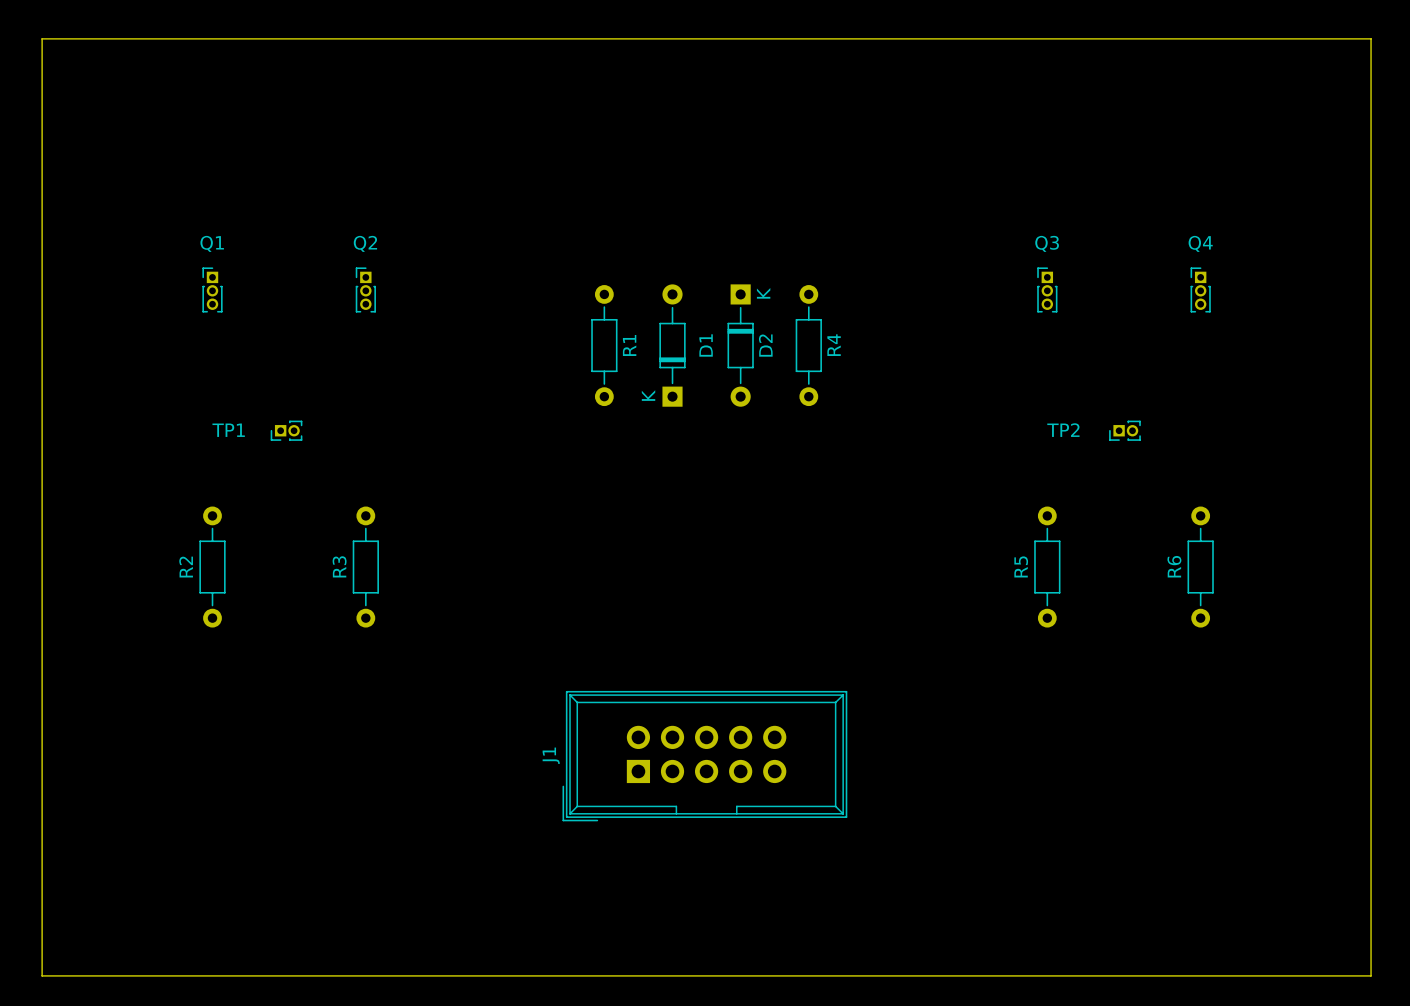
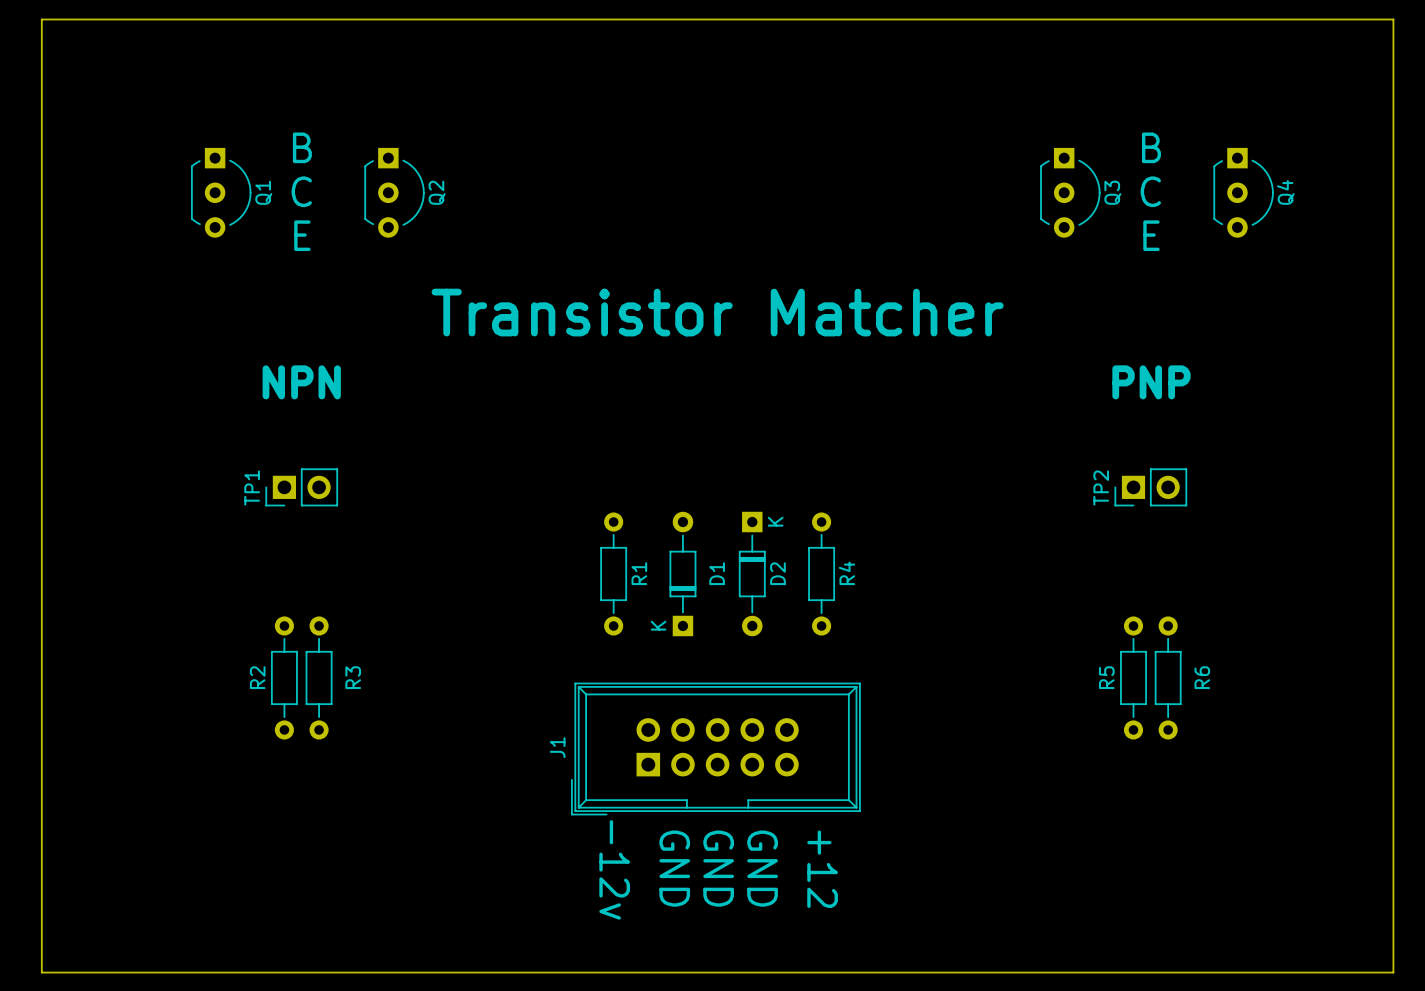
text: none -> B (302, 147)
text: none -> B (1151, 147)
text: none -> C (301, 191)
text: none -> C (1150, 191)
Q1 name position: Q1 (212, 243) -> Q1 (263, 192)
Q2 name position: Q2 (365, 243) -> Q2 (437, 192)
Q3 name position: Q3 (1047, 243) -> Q3 (1112, 192)
Q4 name position: Q4 (1200, 243) -> Q4 (1285, 192)
text: none -> E (302, 235)
text: none -> E (1151, 235)
Q1 footprint: [202, 267, 223, 313] -> [191, 147, 252, 238]
Q2 footprint: [355, 267, 376, 313] -> [364, 147, 425, 238]
Q3 footprint: [1037, 267, 1058, 313] -> [1040, 147, 1101, 238]
Q4 footprint: [1190, 267, 1211, 313] -> [1213, 147, 1274, 238]
text: none -> Transistor Matcher (717, 312)
R1 position: (604, 345) -> (613, 574)
D1 position: (672, 345) -> (682, 574)
D2 position: (740, 345) -> (752, 574)
R4 position: (808, 345) -> (821, 574)
text: none -> NPN (301, 382)
text: none -> PNP (1151, 382)
TP1 footprint: [270, 420, 303, 441] -> [265, 468, 339, 507]
TP2 footprint: [1109, 420, 1141, 441] -> [1114, 468, 1188, 507]
R3 name position: R3 (339, 566) -> R3 (353, 677)
R6 name position: R6 (1174, 566) -> R6 (1202, 677)
R2 position: (212, 567) -> (284, 677)
R3 position: (365, 567) -> (319, 677)
R5 position: (1047, 567) -> (1133, 677)
R6 position: (1200, 567) -> (1168, 677)
text: none -> GND (674, 868)
text: none -> GND (718, 868)
text: none -> GND (762, 868)
text: none -> +12 (822, 869)
text: none -> -12v (614, 869)

